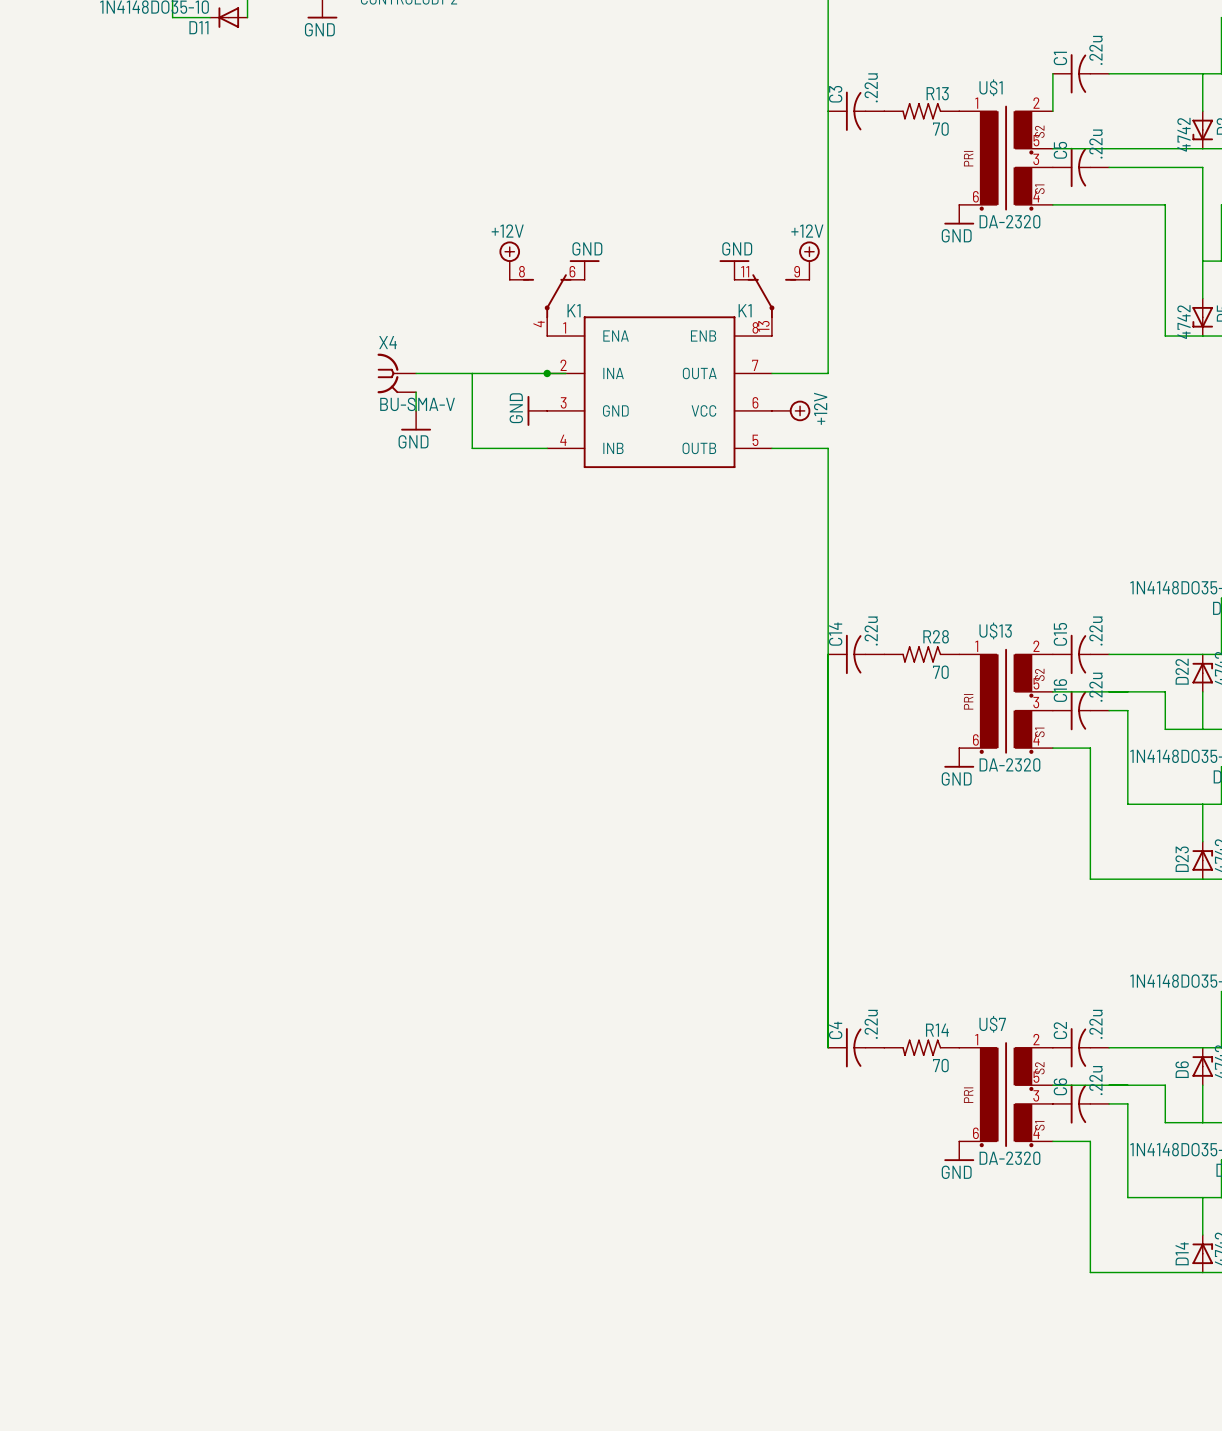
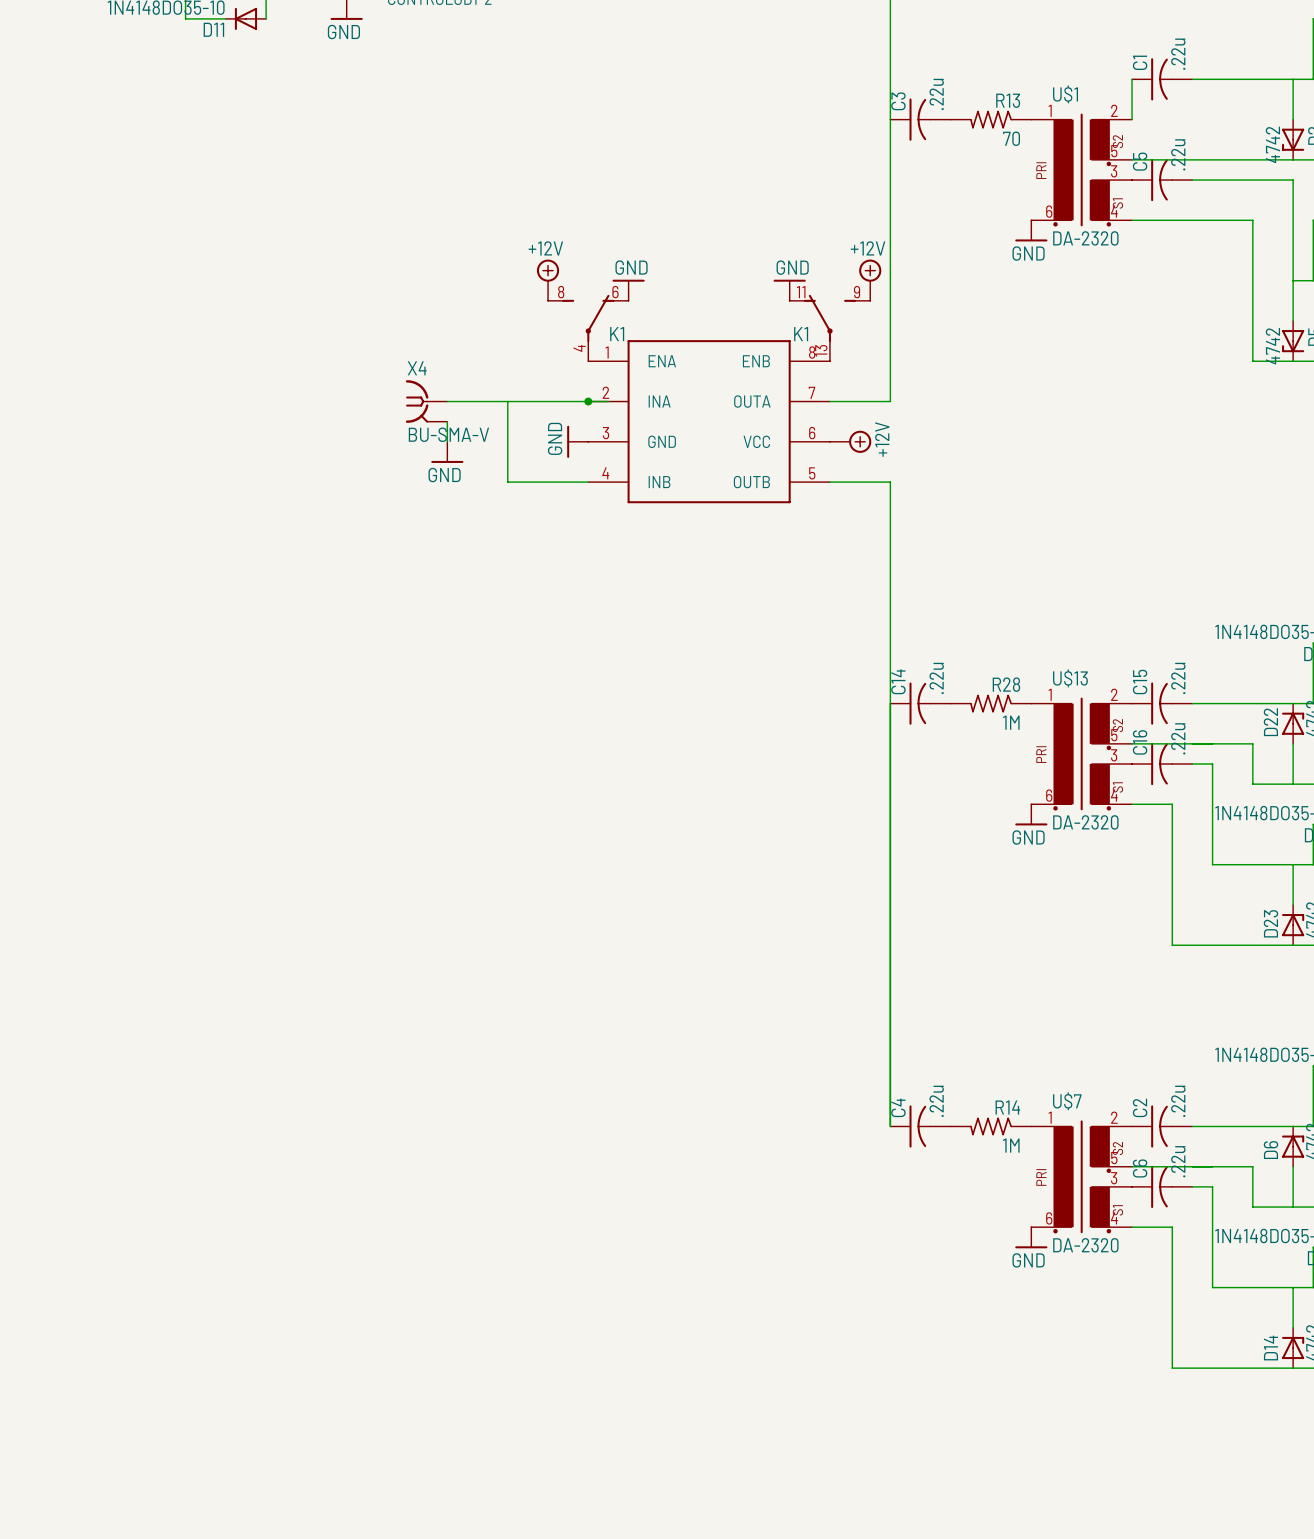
R28 value: 70 (940, 672) -> 1M (1011, 722)
R14 value: 70 (940, 1065) -> 1M (1011, 1145)

